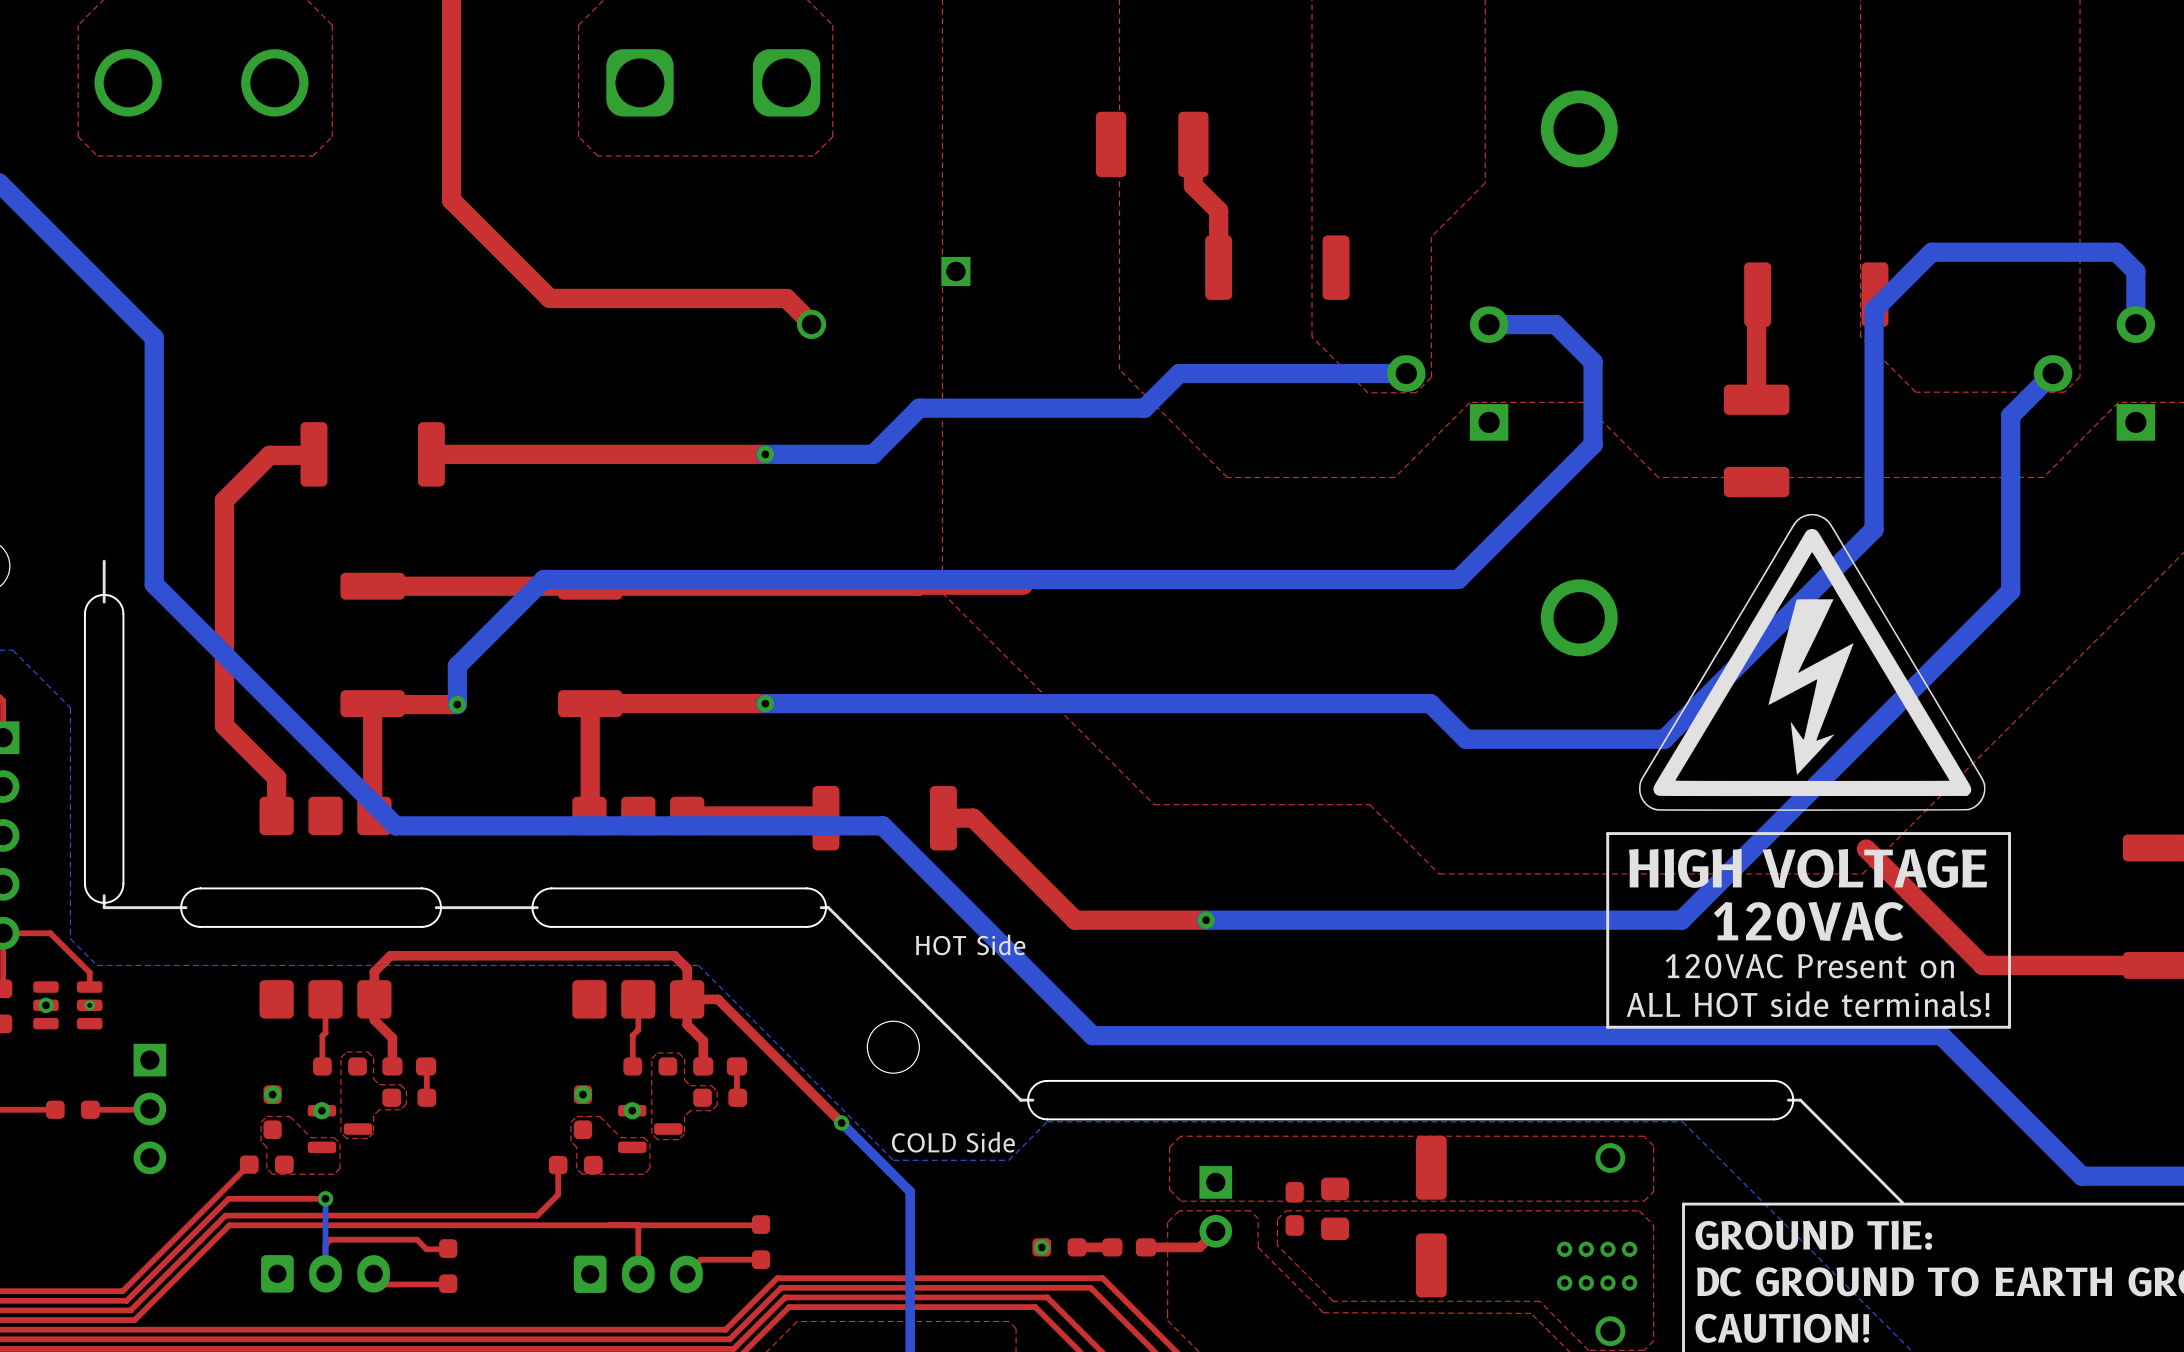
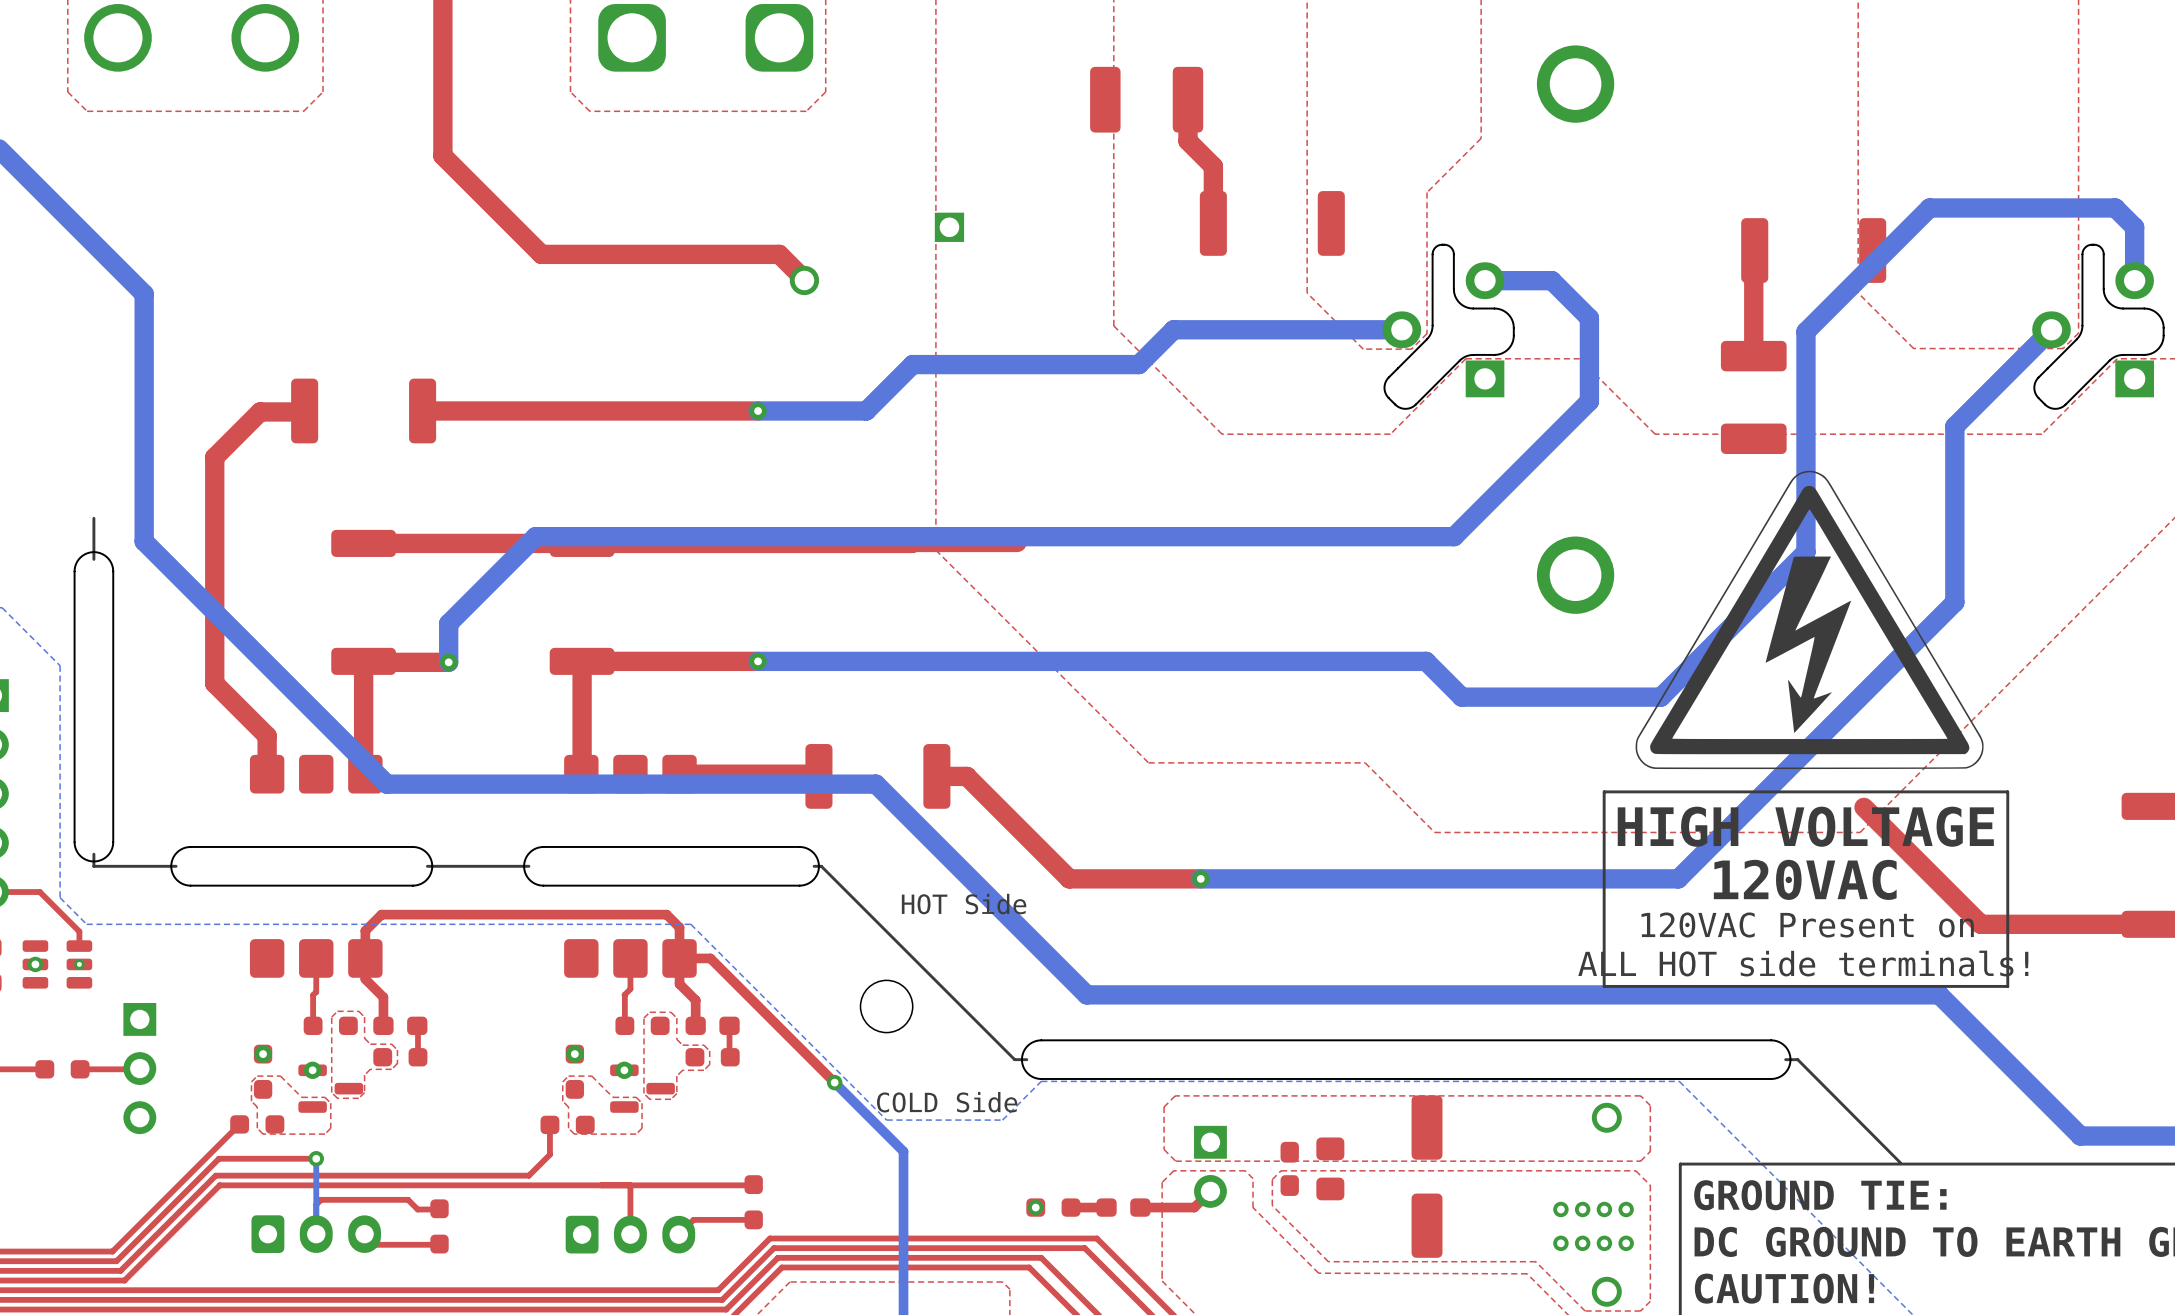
board edge: none -> (1444, 244) (1436, 246) (1432, 253) (1431, 333) (1388, 377) (1384, 384) (1387, 396) (1402, 408) (1414, 405) (1462, 358) (1471, 355) (1500, 353) (1508, 349) (1513, 339) (1512, 321) (1504, 311) (1496, 308) (1468, 308) (1458, 301) (1453, 291) (1453, 251) (1450, 246) (1444, 244)
board edge: none -> (2094, 244) (2086, 246) (2082, 253) (2080, 333) (2038, 377) (2034, 384) (2037, 396) (2052, 408) (2064, 405) (2112, 358) (2121, 355) (2150, 353) (2159, 347) (2163, 339) (2162, 321) (2154, 311) (2146, 308) (2118, 308) (2107, 301) (2103, 291) (2103, 251) (2099, 246) (2094, 244)
bottom track: (1874, 309) (1874, 529) (1808, 594) -> (1871, 265) (1805, 331) (1805, 552)
bottom track: (2010, 415) (2010, 591) (1956, 644) -> (2008, 372) (1954, 426) (1954, 602)

